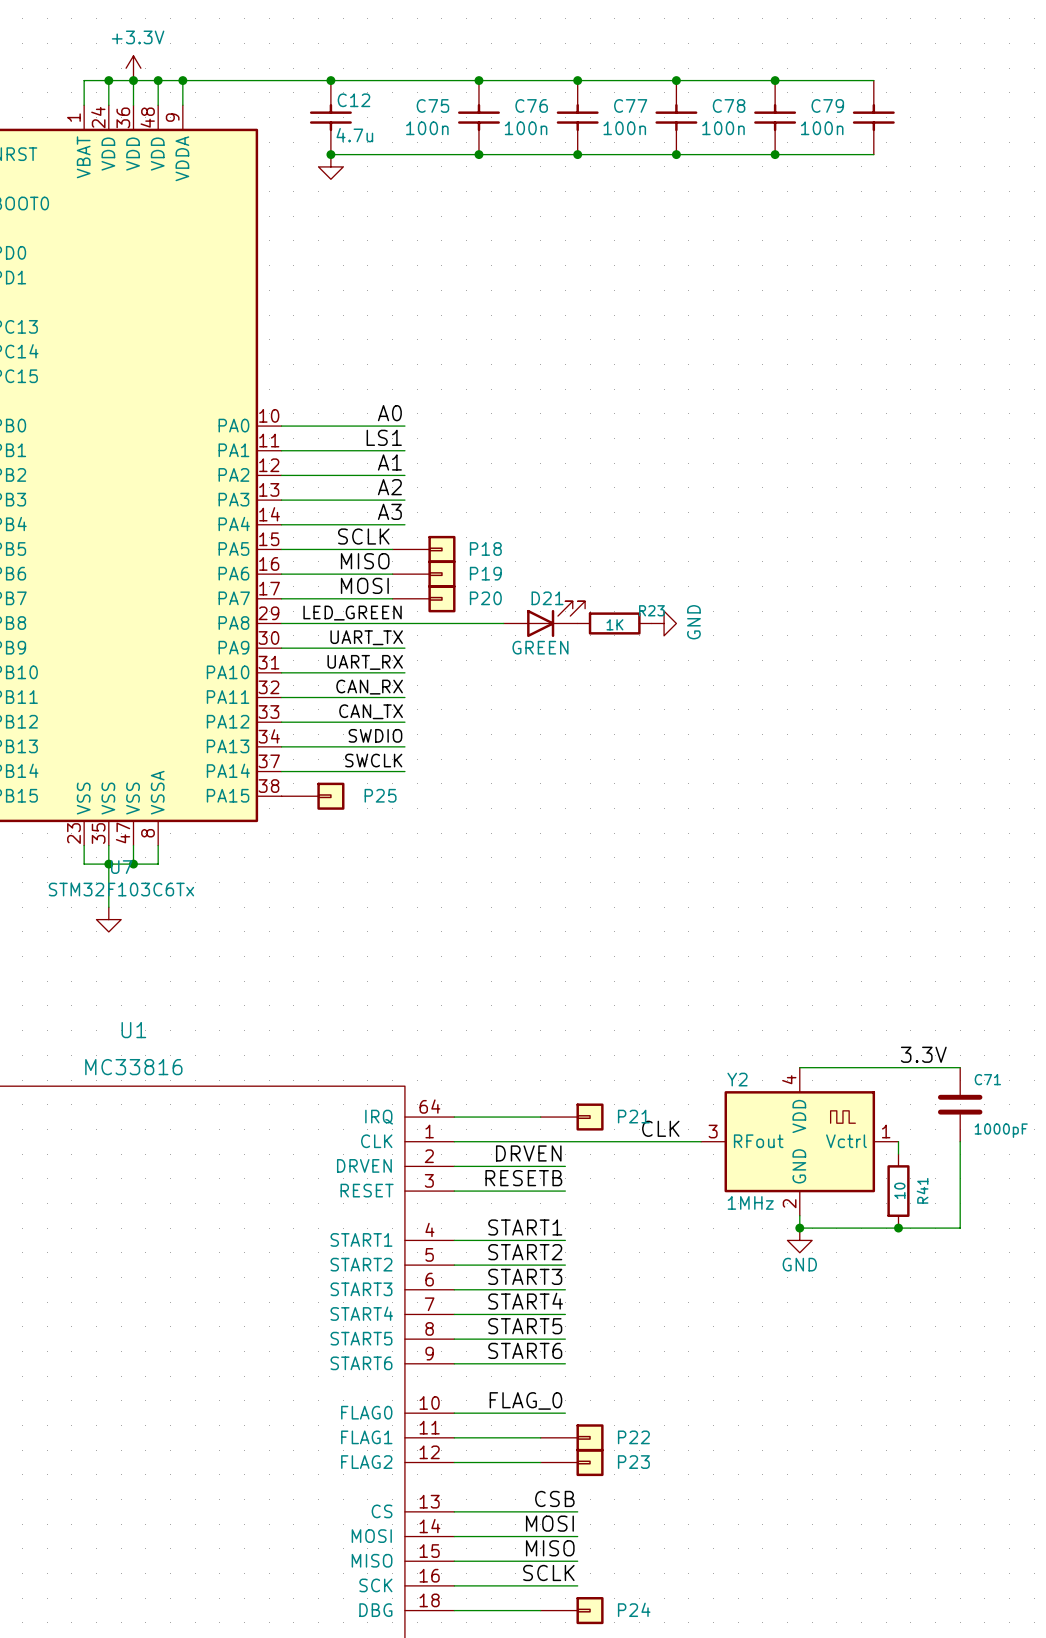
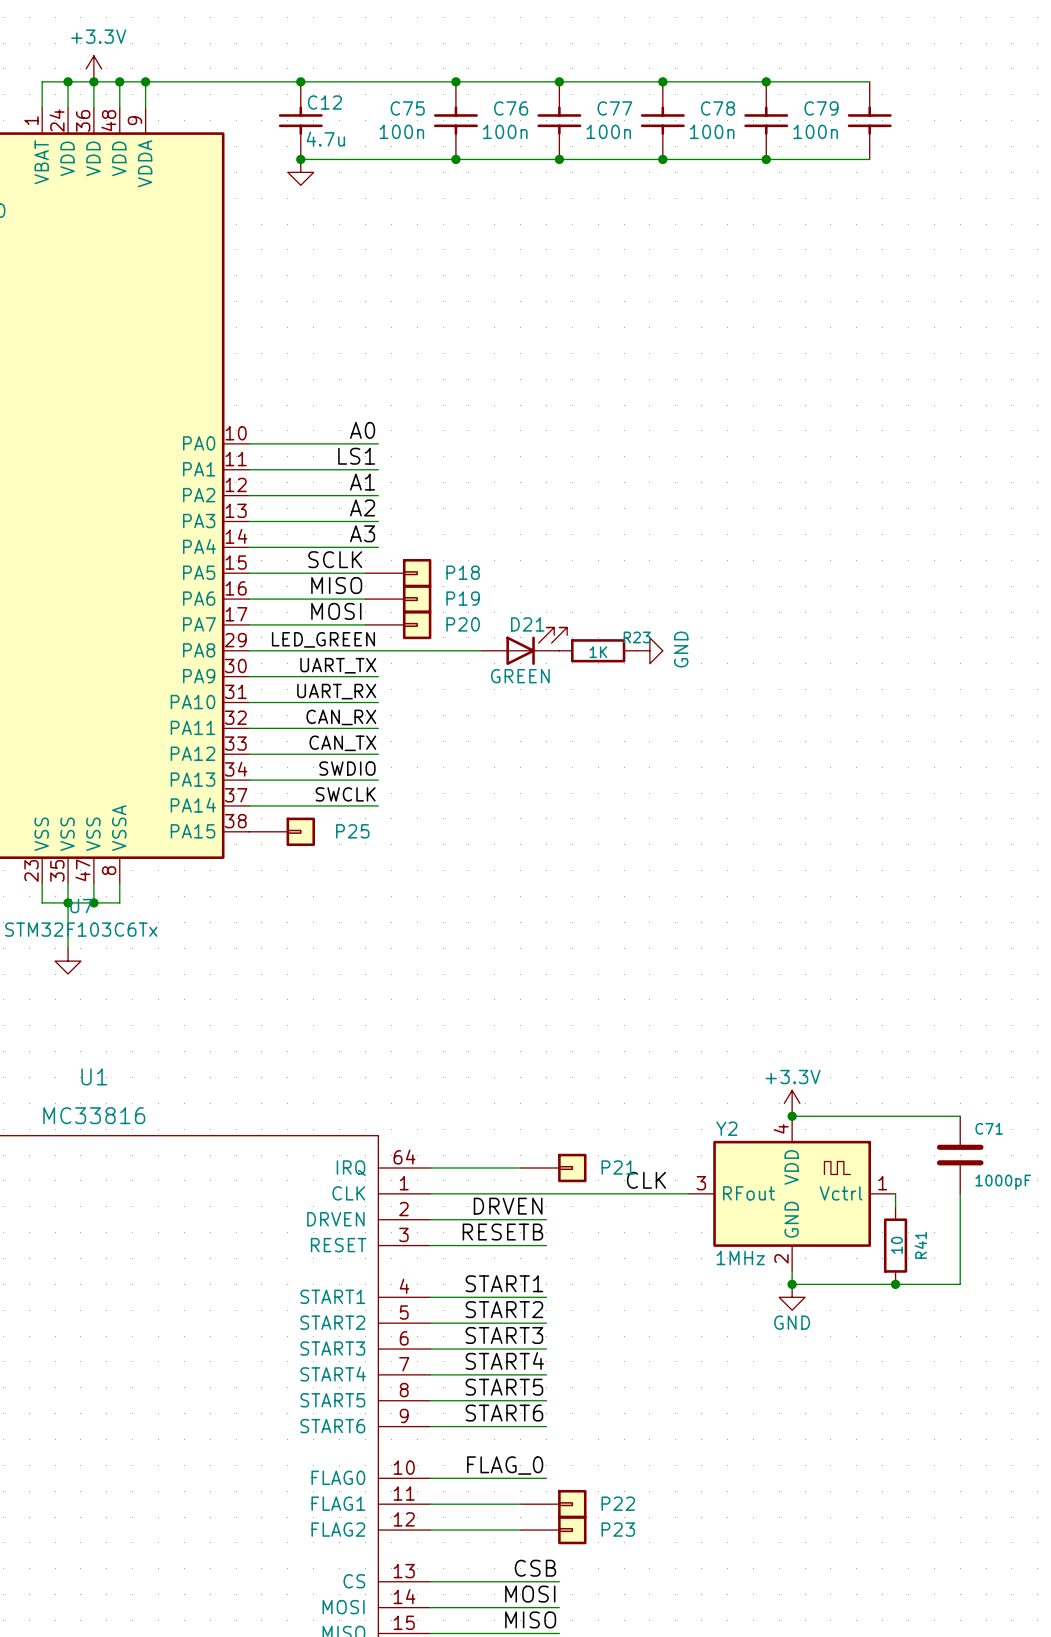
label: 3.3V (923, 1054) -> none
power symbol: none -> +3.3V (792, 1103)
junction: none -> (792, 1116)

